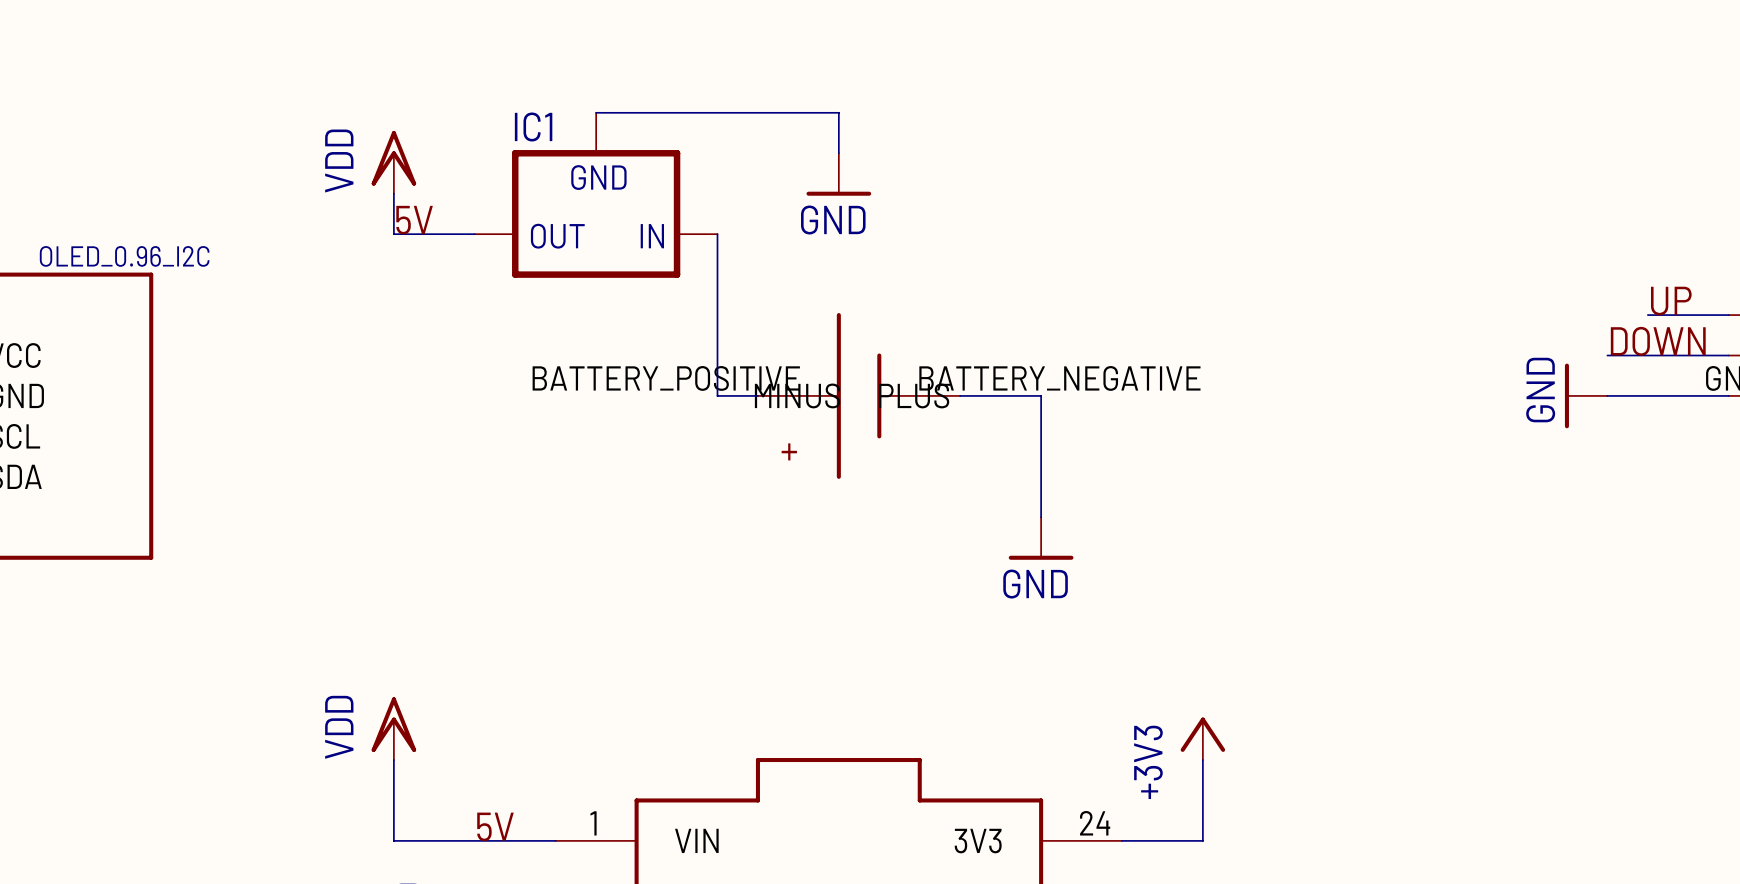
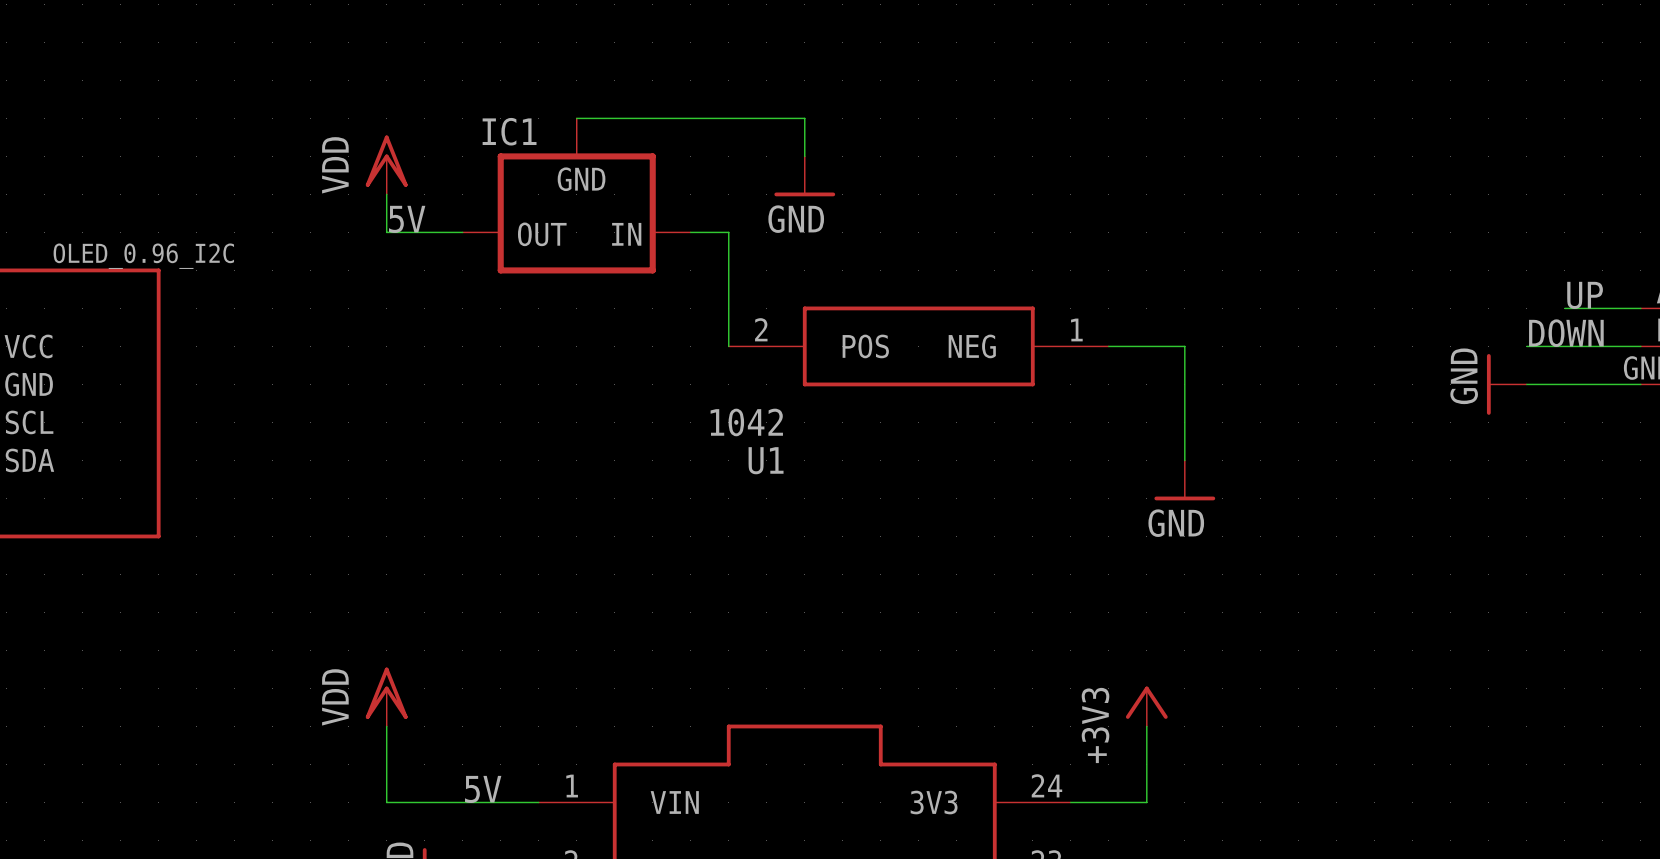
wire: (717, 234) (717, 395) (757, 395) -> (690, 232) (728, 232) (728, 346)
U1: none -> 1042 (918, 346)
part: (859, 395) -> none
wire: (960, 395) (1041, 395) (1041, 517) -> (1108, 346) (1184, 346) (1184, 460)
power symbol position: GND (1041, 538) -> GND (1184, 480)

